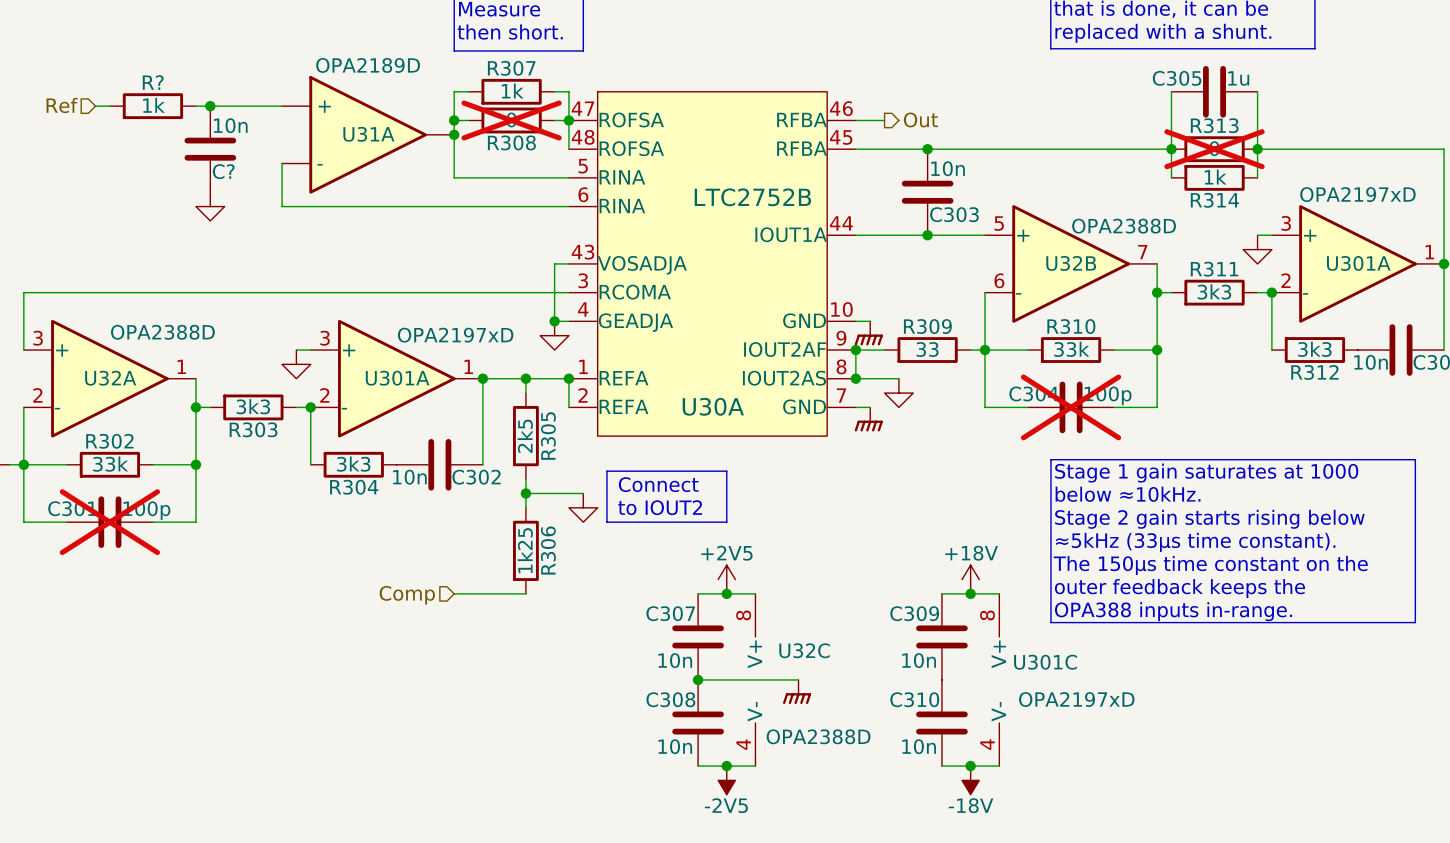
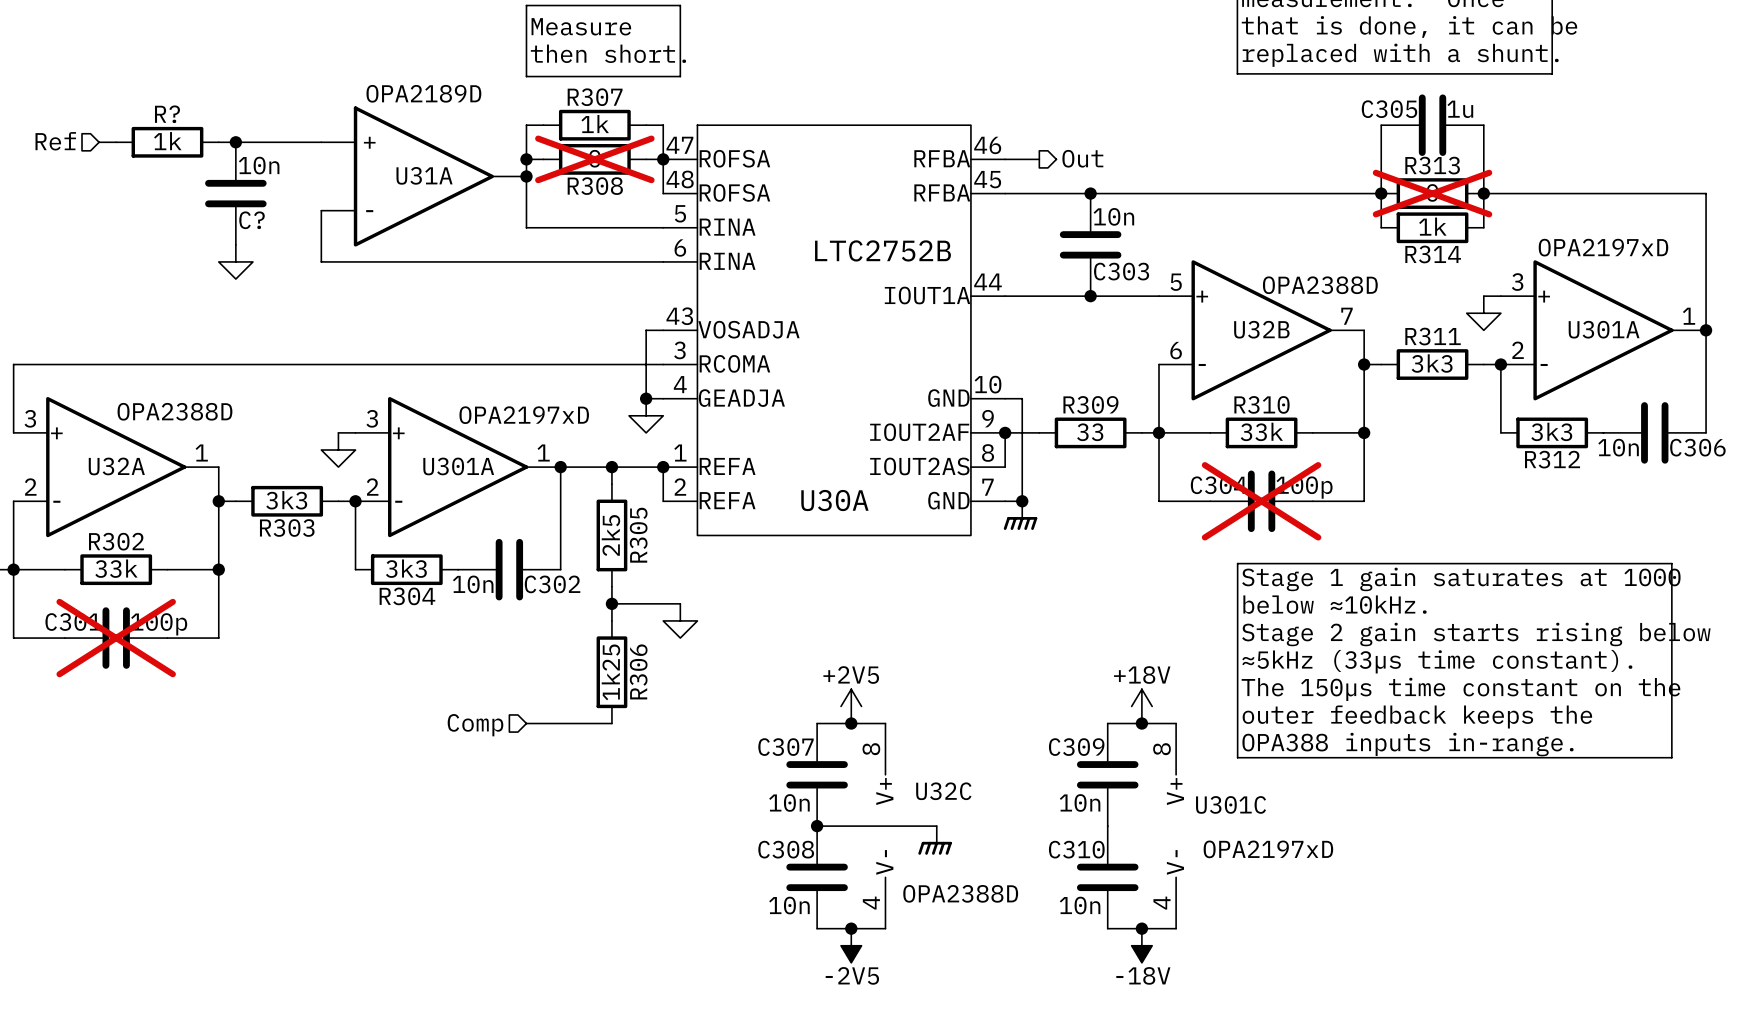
wire: none -> (1022, 398) (1022, 501)
power symbol: (868, 333) -> none
wire: (855, 378) (898, 378) -> none
junction position: (855, 378) -> (1022, 501)
power symbol: (898, 393) -> none
line: (606, 471) (726, 471) (726, 522) (606, 522) (606, 471) -> none
text: Connect (658, 484) -> none
text: to IOUT2 (660, 507) -> none

